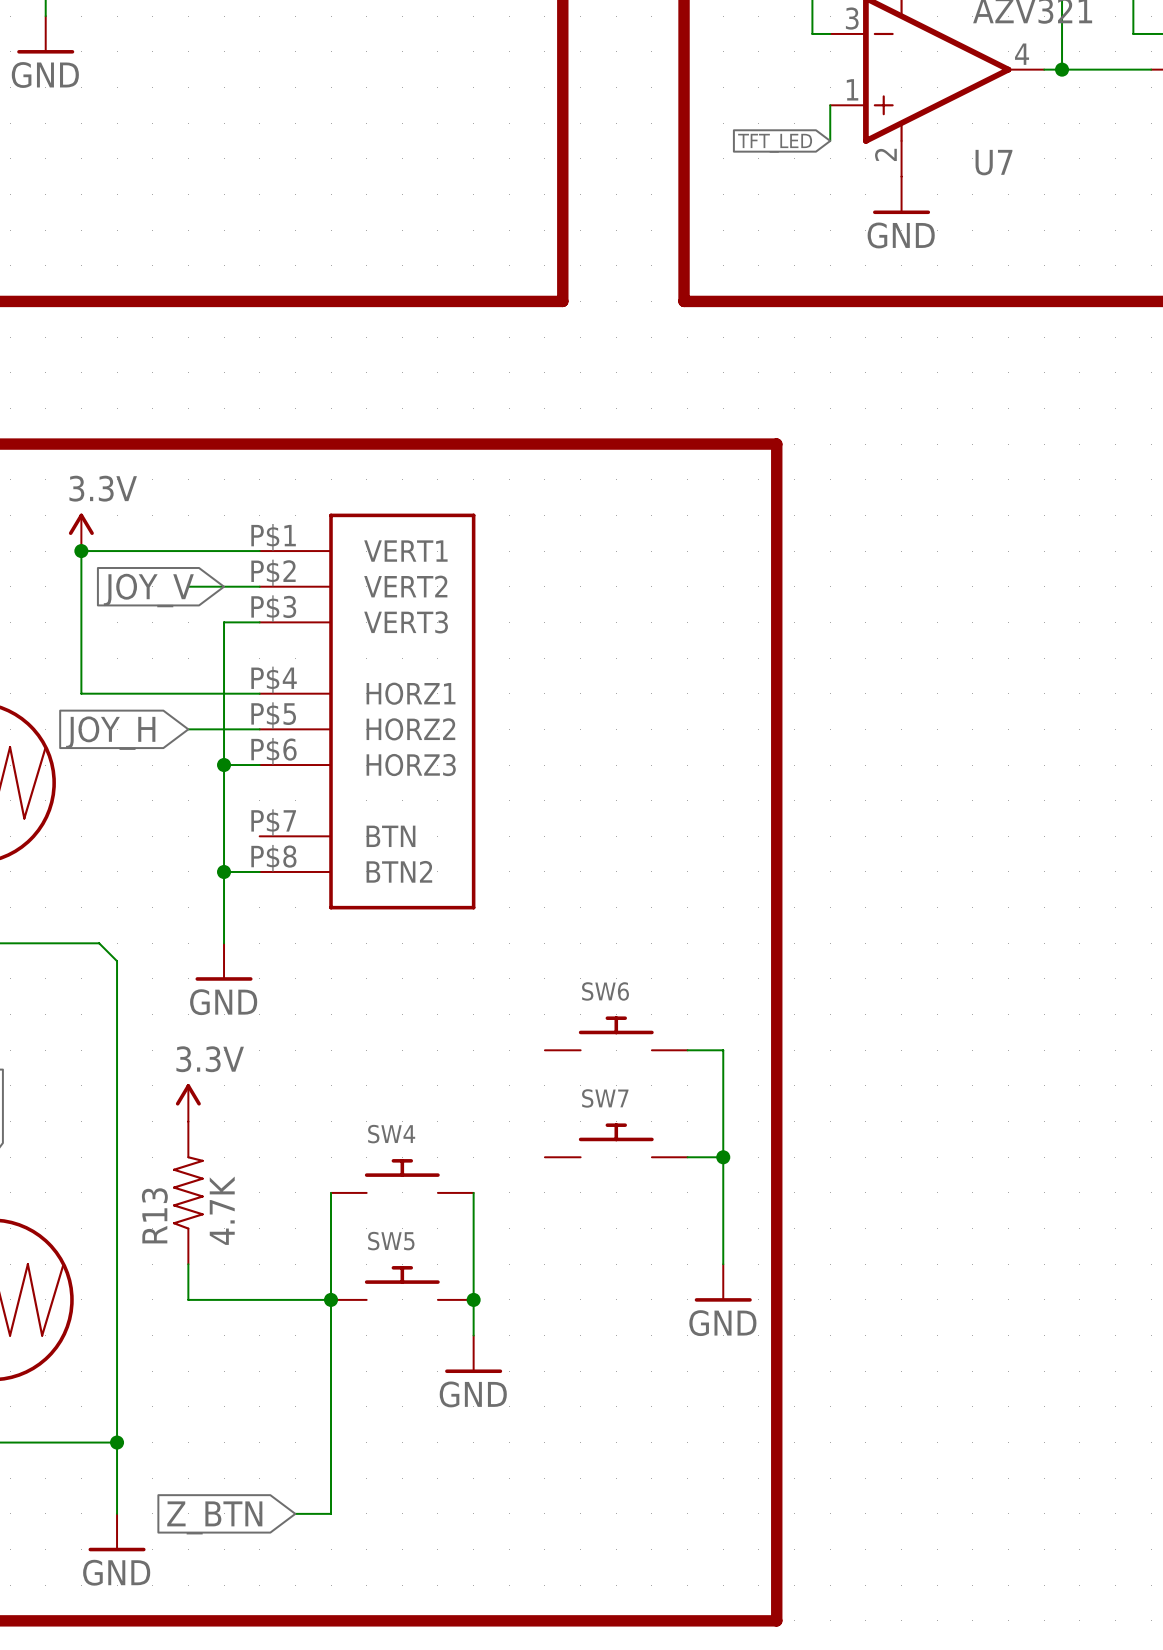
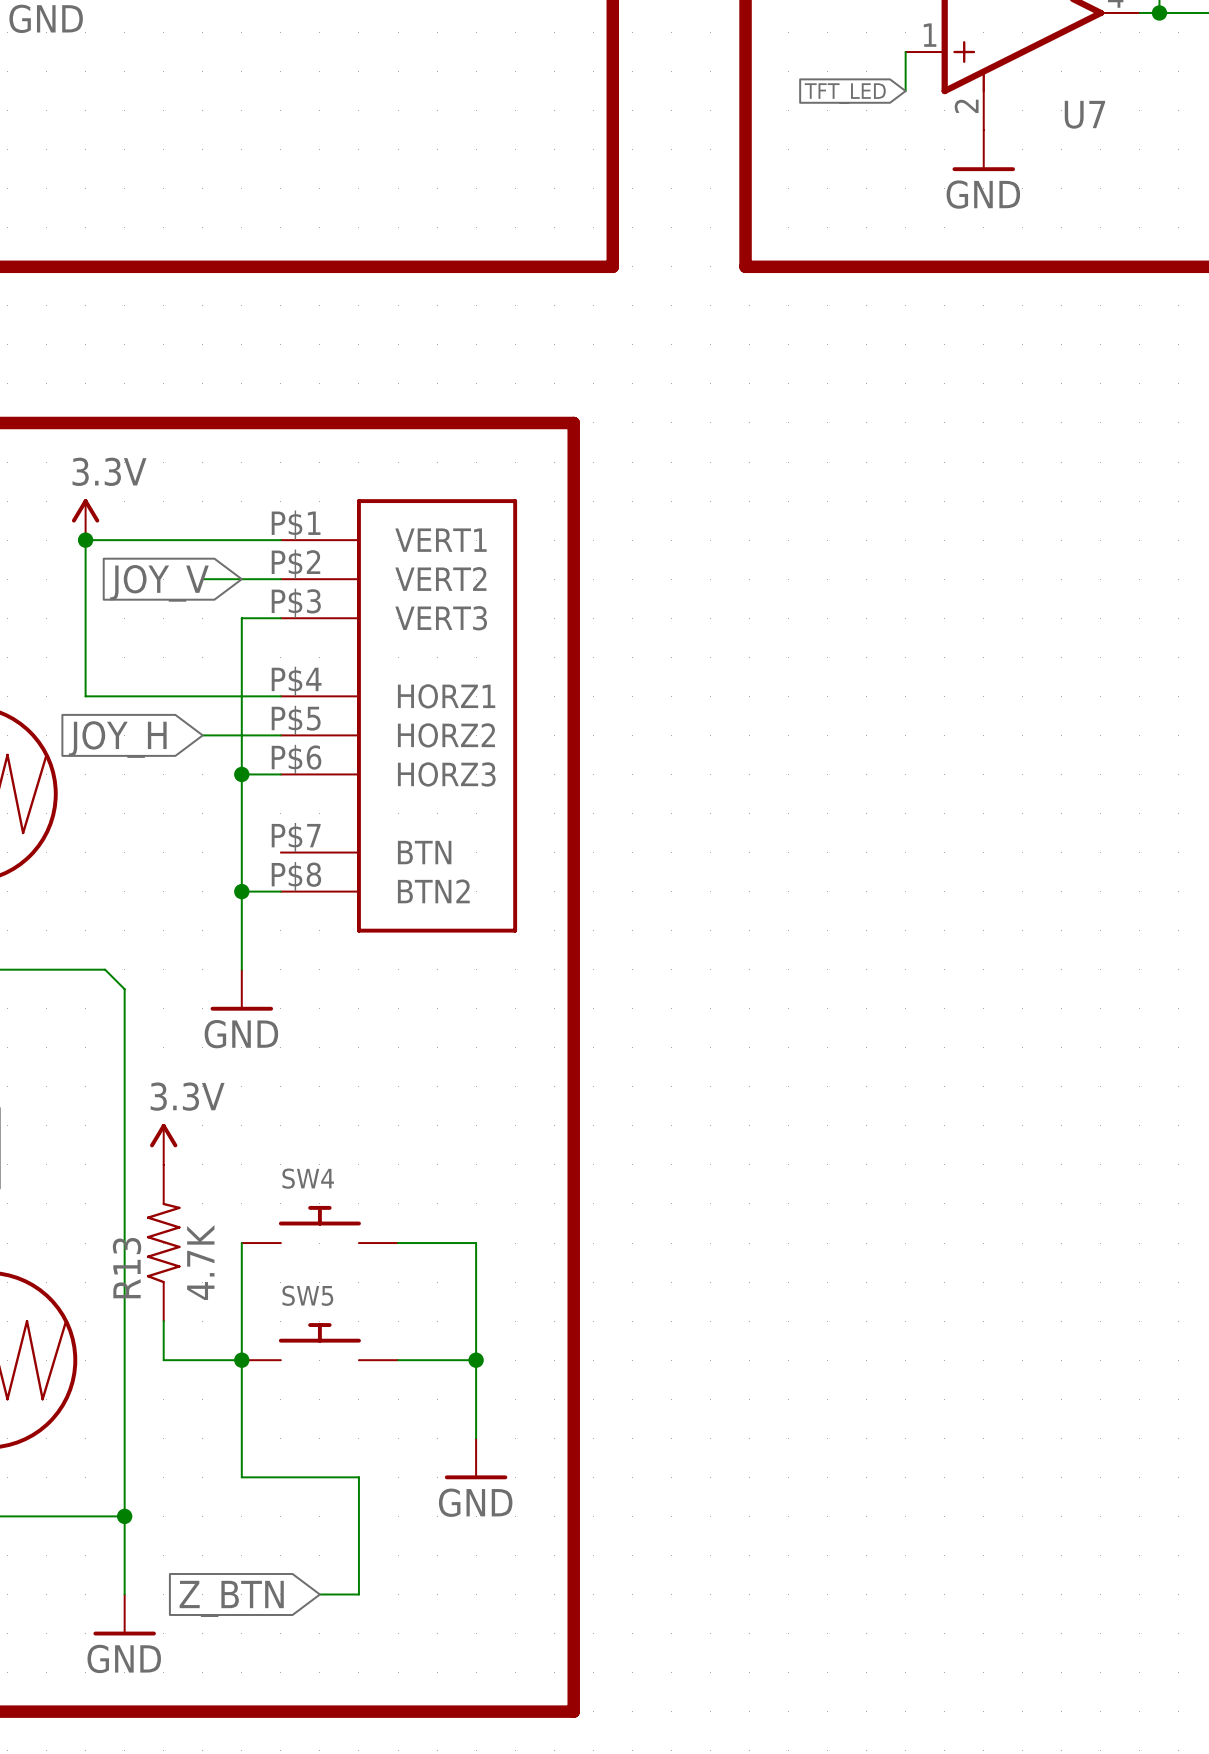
line: (527, 444) (776, 444) (776, 1620) (527, 1620) -> (573, 422) (573, 1711)
SW6: (616, 1033) -> none
wire: (687, 1050) (723, 1050) (723, 1264) -> none
power symbol position: 3.3V (188, 1102) -> 3.3V (163, 1144)
SW7: (616, 1140) -> none
wire: (687, 1157) (723, 1157) -> none
junction: (723, 1157) -> none
SW4 position: (402, 1175) -> (319, 1224)
R13 position: (188, 1192) -> (163, 1243)
wire: (331, 1192) (331, 1406) -> (241, 1243) (241, 1477) (358, 1477)
wire: none -> (398, 1243) (476, 1243) (476, 1438)
wire: (473, 1192) (473, 1335) -> none
wire: (188, 1264) (188, 1299) -> (163, 1321) (163, 1360) (202, 1360)
SW5 position: (402, 1282) -> (319, 1341)
power symbol: GND (723, 1282) -> none
wire: (224, 1299) (331, 1299) -> none
junction: none -> (241, 1360)
junction: (331, 1299) -> none
wire: none -> (398, 1360) (476, 1360)
junction position: (473, 1299) -> (476, 1360)
power symbol position: GND (473, 1354) -> GND (476, 1458)

